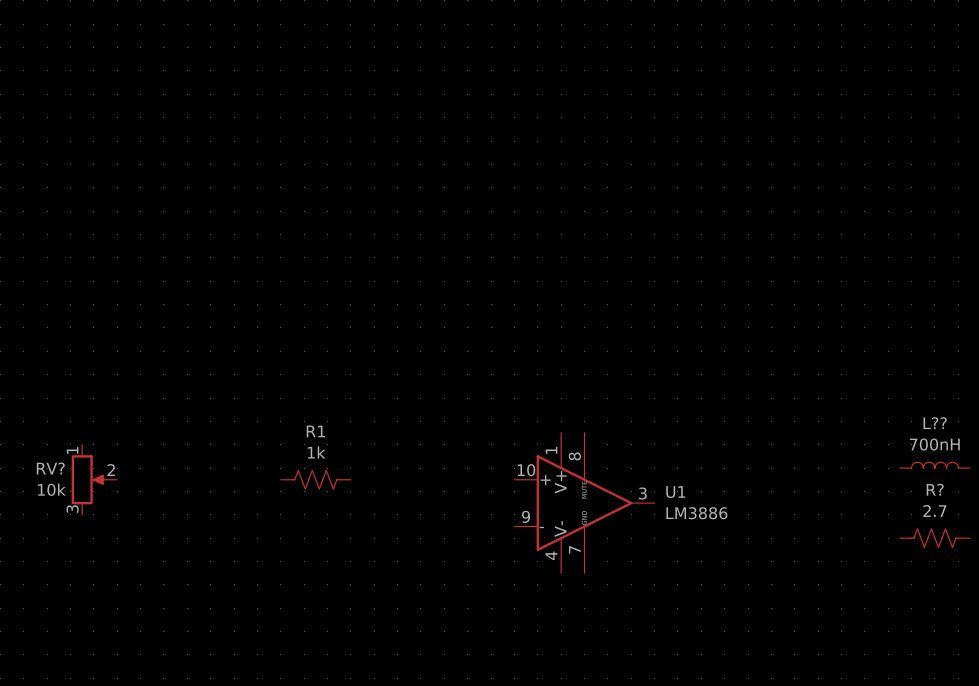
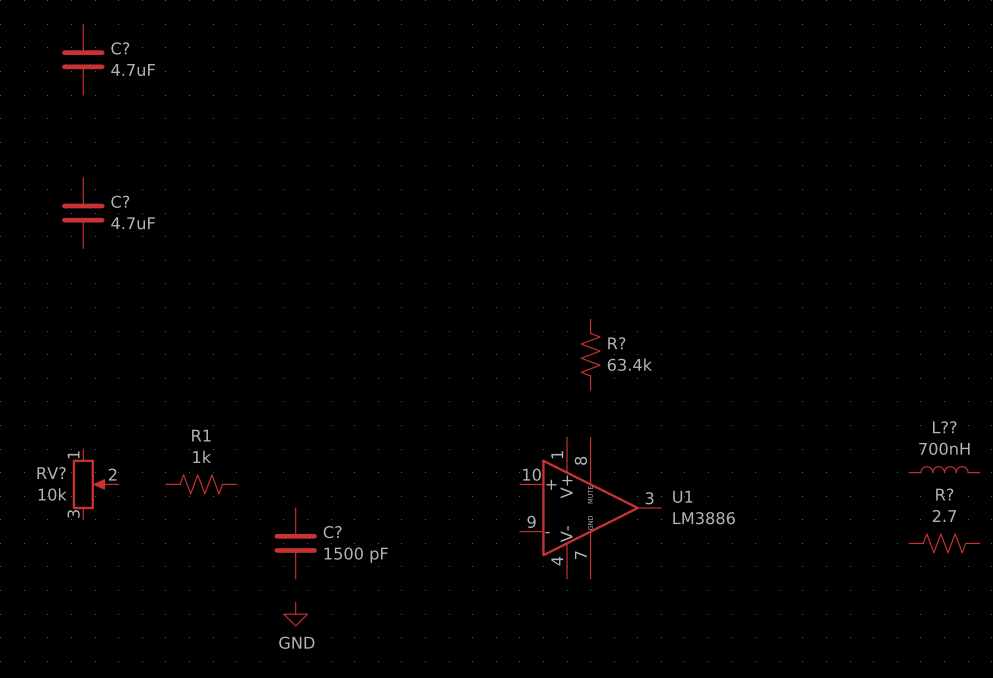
C?: none -> 4.7uF (83, 59)
C?: none -> 4.7uF (83, 213)
R?: none -> 63.4k (590, 354)
R1 position: (315, 479) -> (201, 484)
C?: none -> 1500 pF (295, 543)
power symbol: none -> GND (295, 614)

